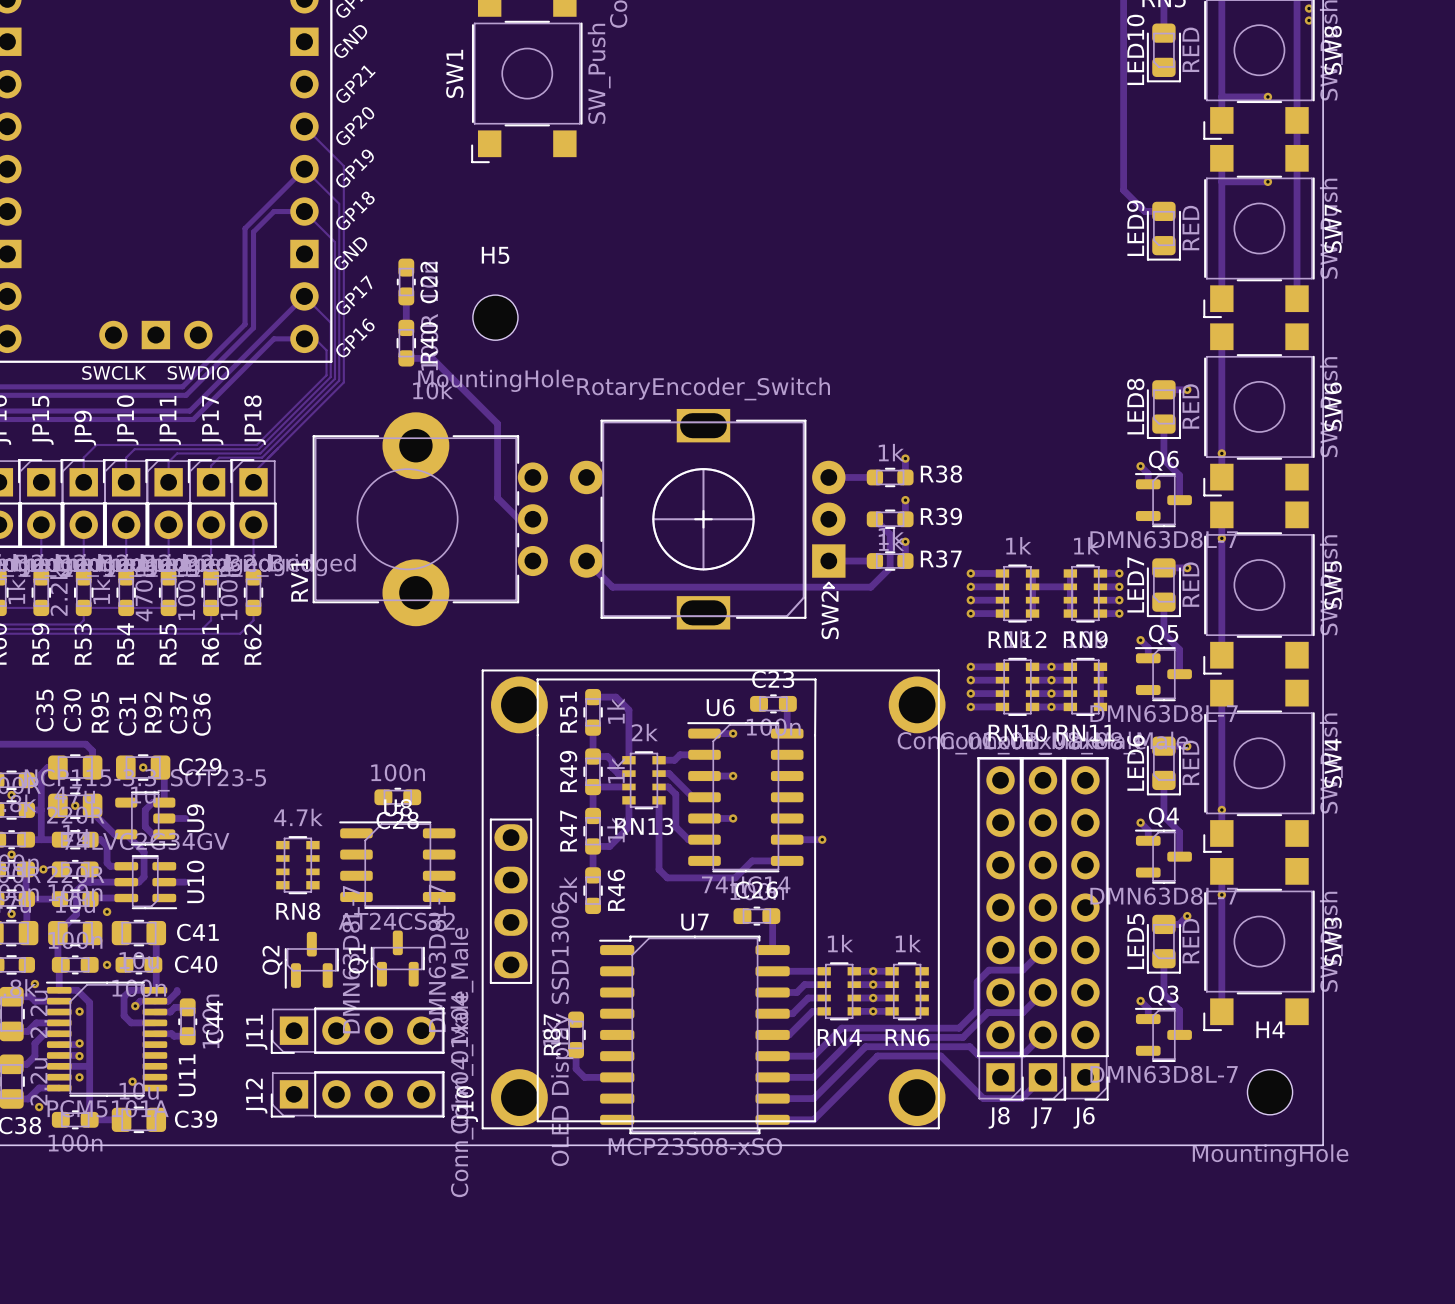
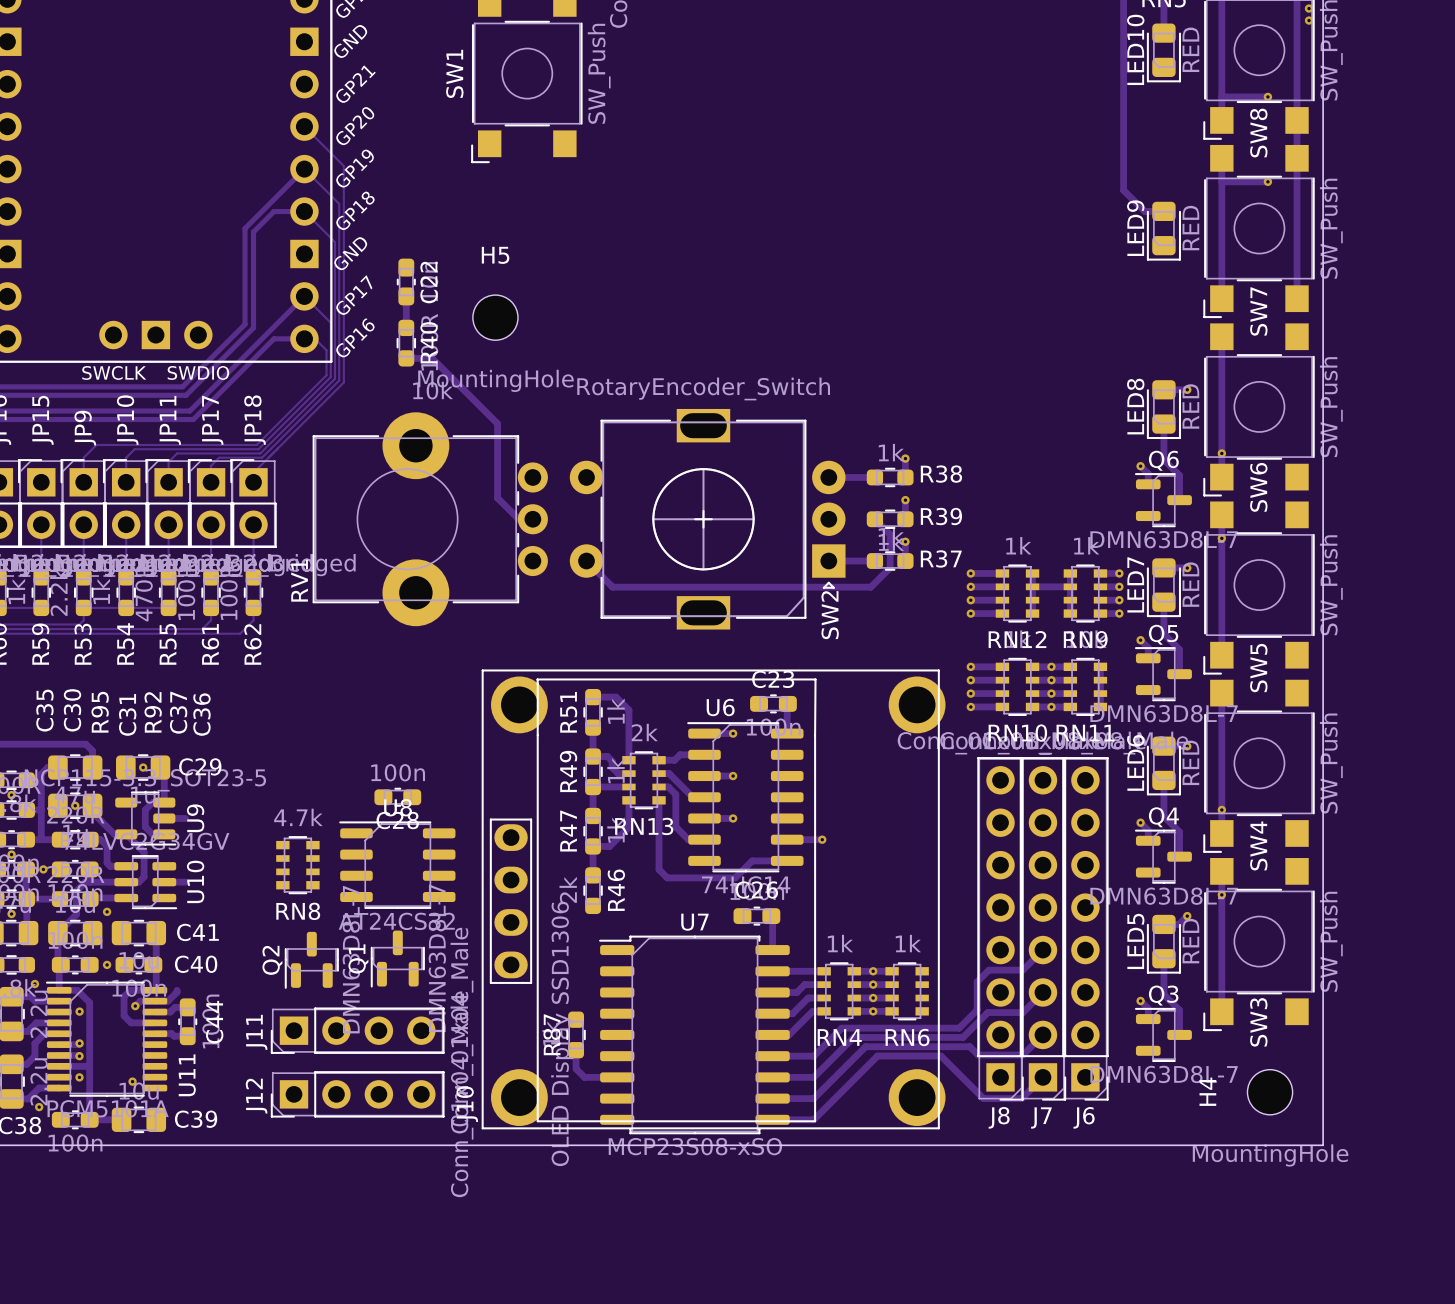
SW8 name position: SW8 (1333, 50) -> SW8 (1258, 133)
SW7 name position: SW7 (1333, 228) -> SW7 (1258, 311)
SW6 name position: SW6 (1333, 406) -> SW6 (1258, 487)
SW5 name position: SW5 (1333, 585) -> SW5 (1258, 668)
SW4 name position: SW4 (1333, 763) -> SW4 (1258, 845)
SW3 name position: SW3 (1333, 941) -> SW3 (1258, 1022)
H4 name rotation: 0° (1270, 1029) -> 90° counterclockwise (1207, 1091)
H4 name position: H4 (1270, 1029) -> H4 (1207, 1091)

